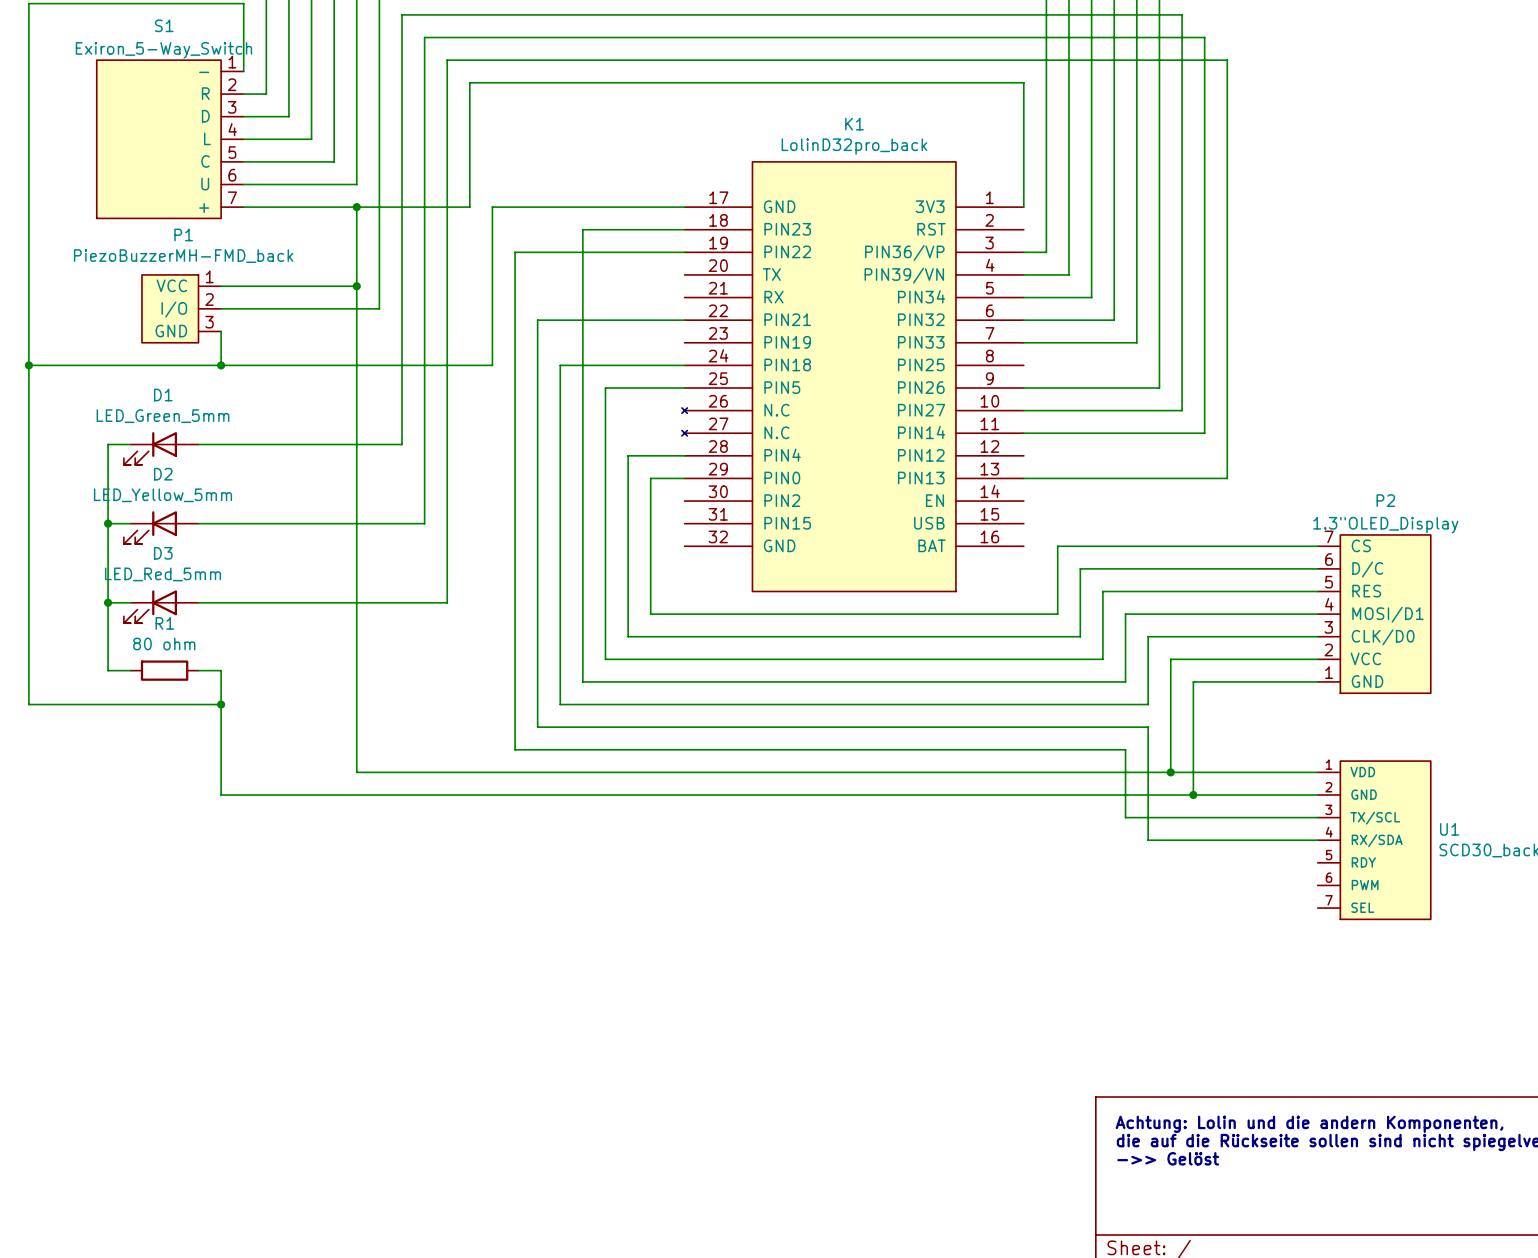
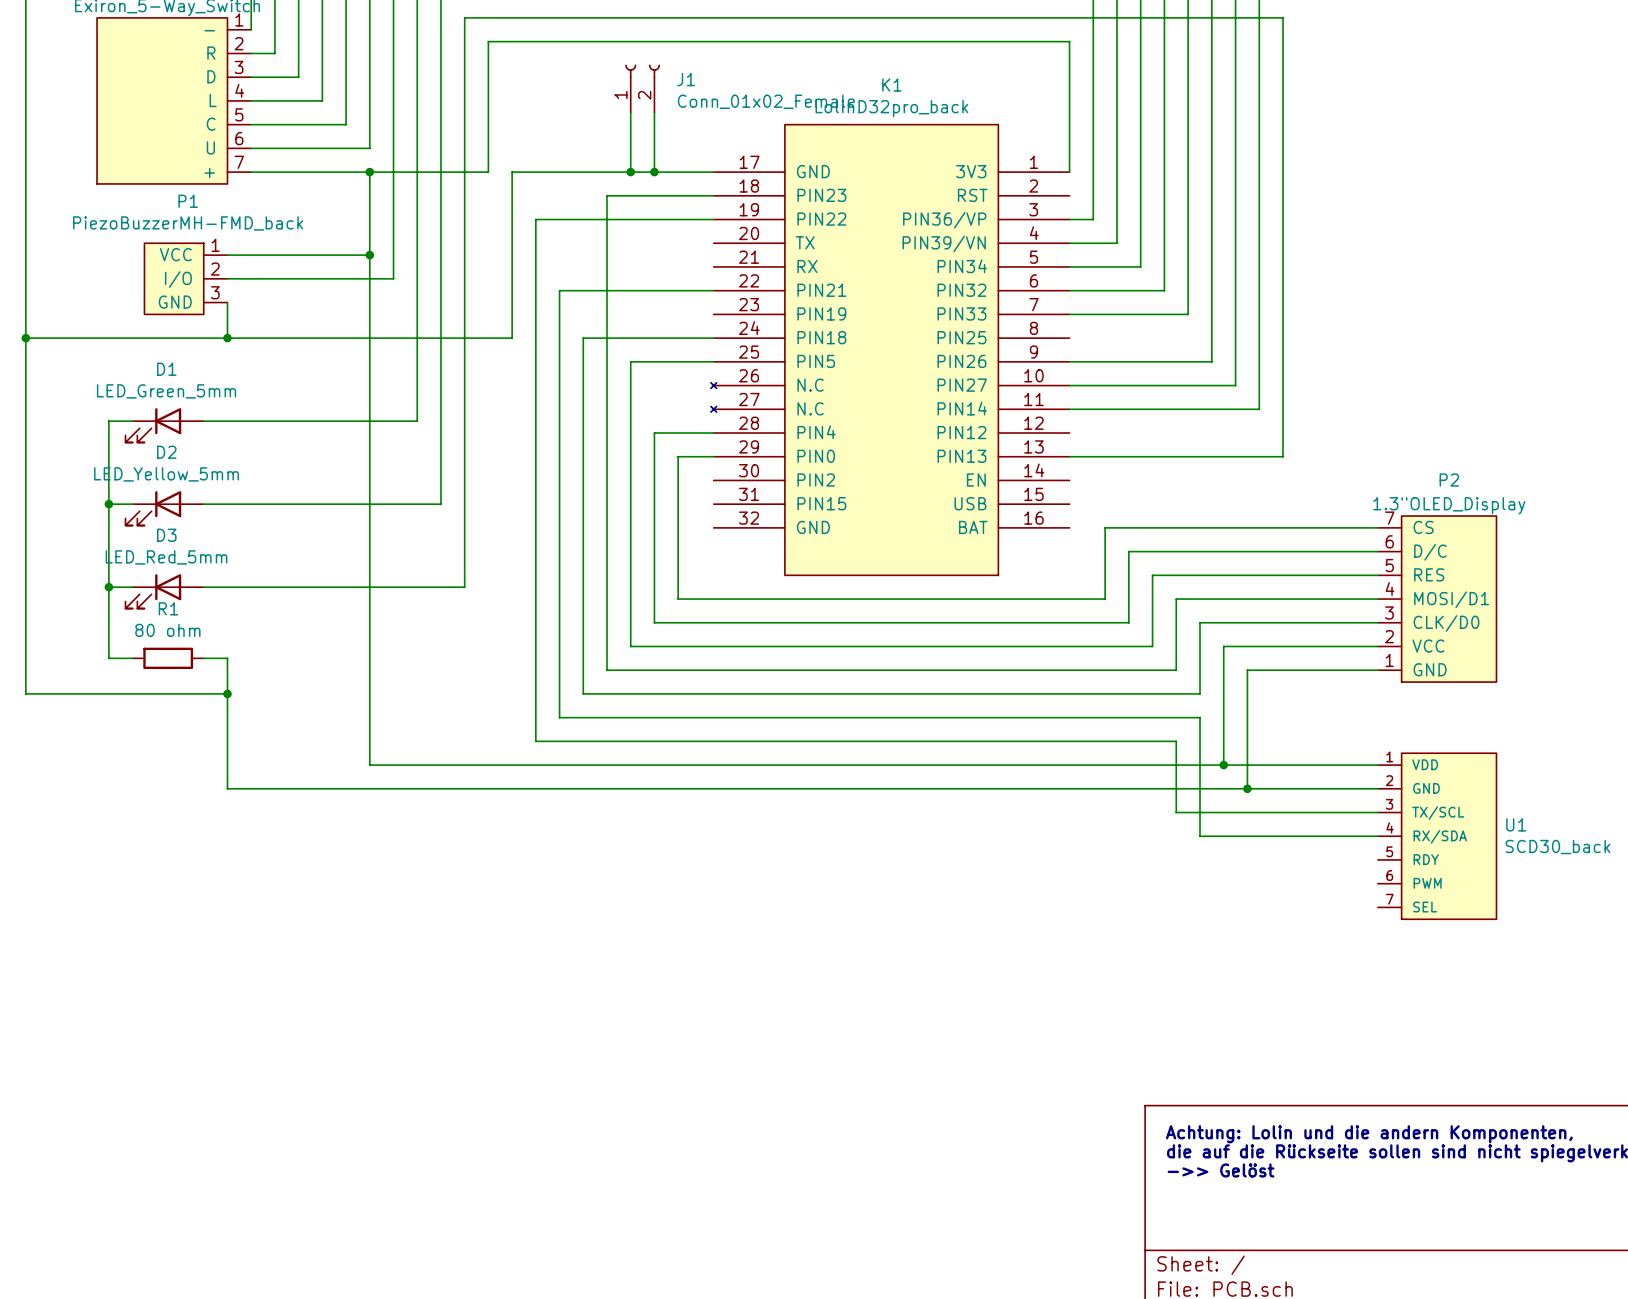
J1: none -> Conn_01x02_Female (642, 88)
wire: none -> (630, 112) (630, 172)
wire: none -> (654, 112) (654, 172)
junction: none -> (630, 172)
junction: none -> (654, 172)

